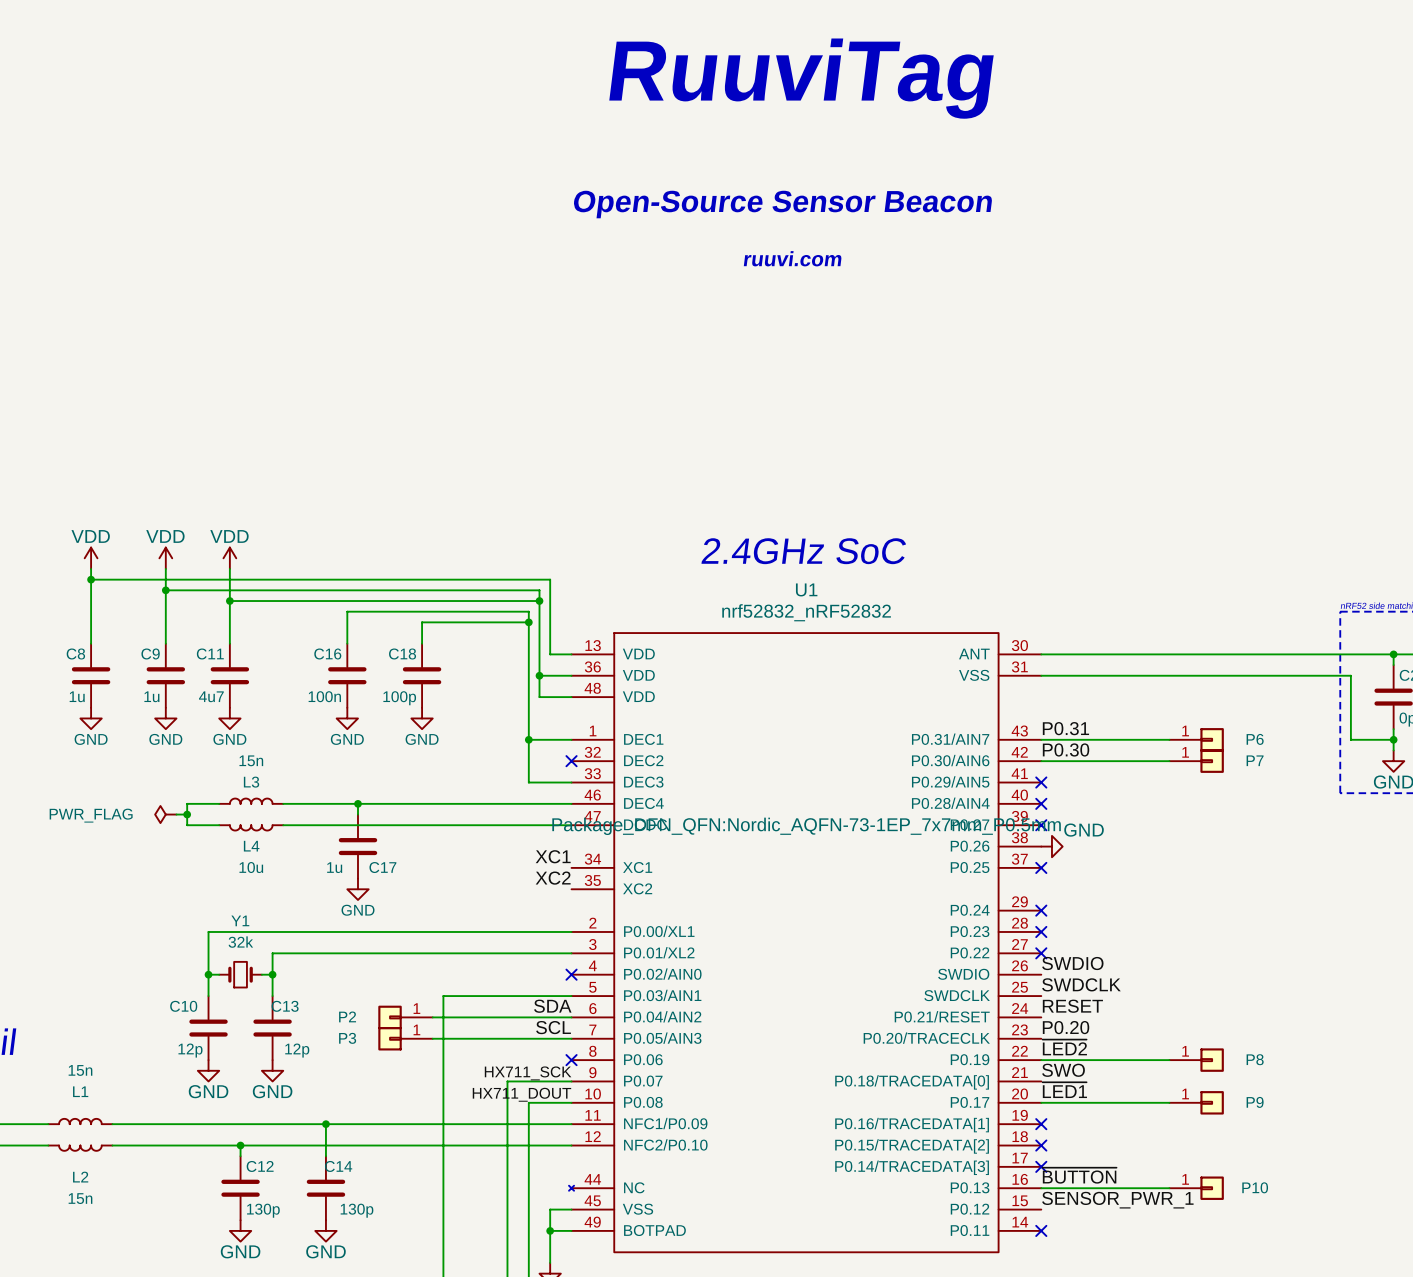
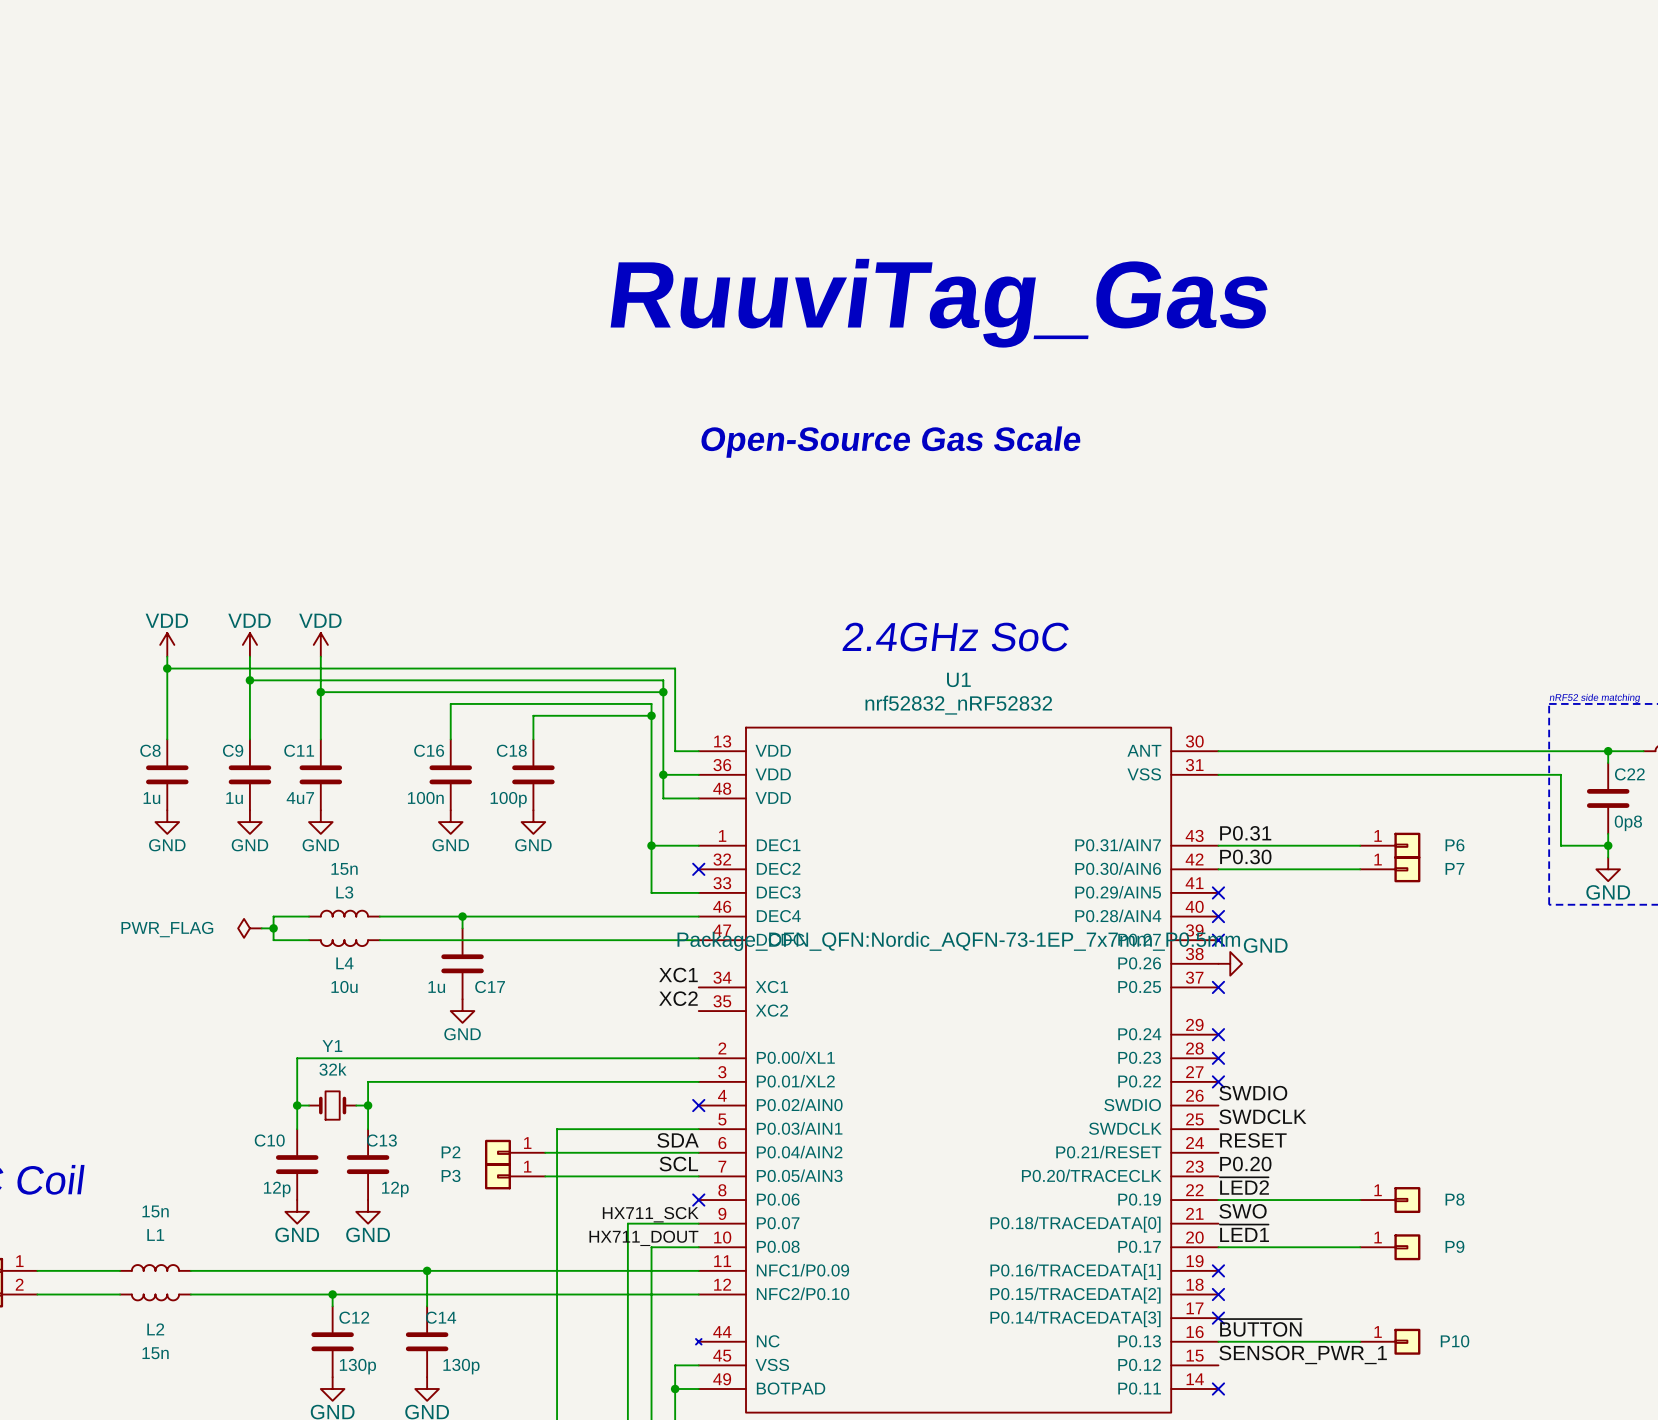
text: RuuviTag (801, 78) -> none
text: Open-Source Sensor Beacon (782, 204) -> none
text: none -> RuuviTag_Gas (939, 303)
text: ruuvi.com (792, 258) -> none
text: none -> Open-Source Gas Scale (890, 442)

